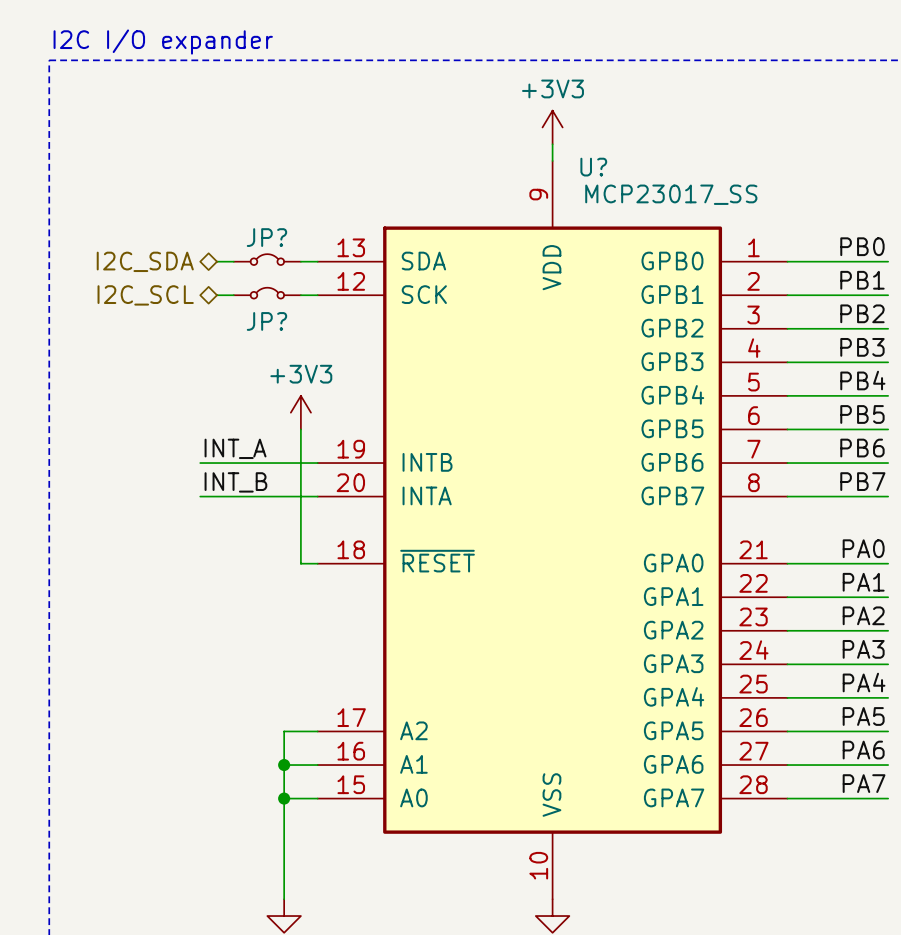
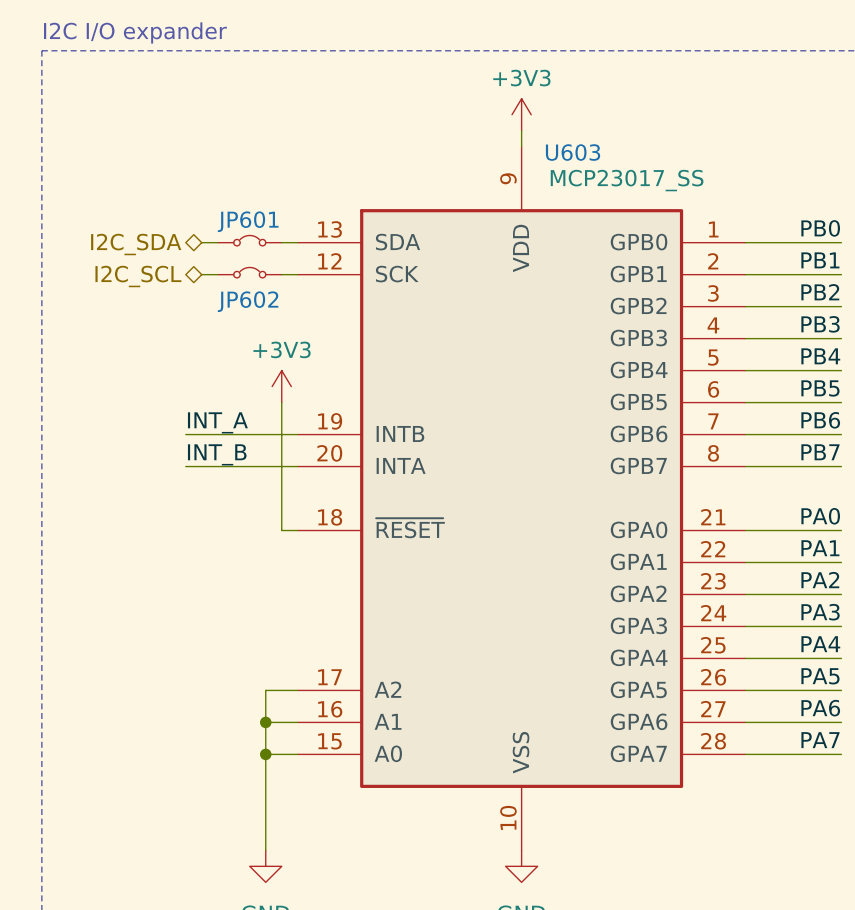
U? name: U? (593, 167) -> U603 (573, 152)
JP? name: JP? (266, 237) -> JP601 (248, 221)
JP? name: JP? (266, 321) -> JP602 (248, 301)

